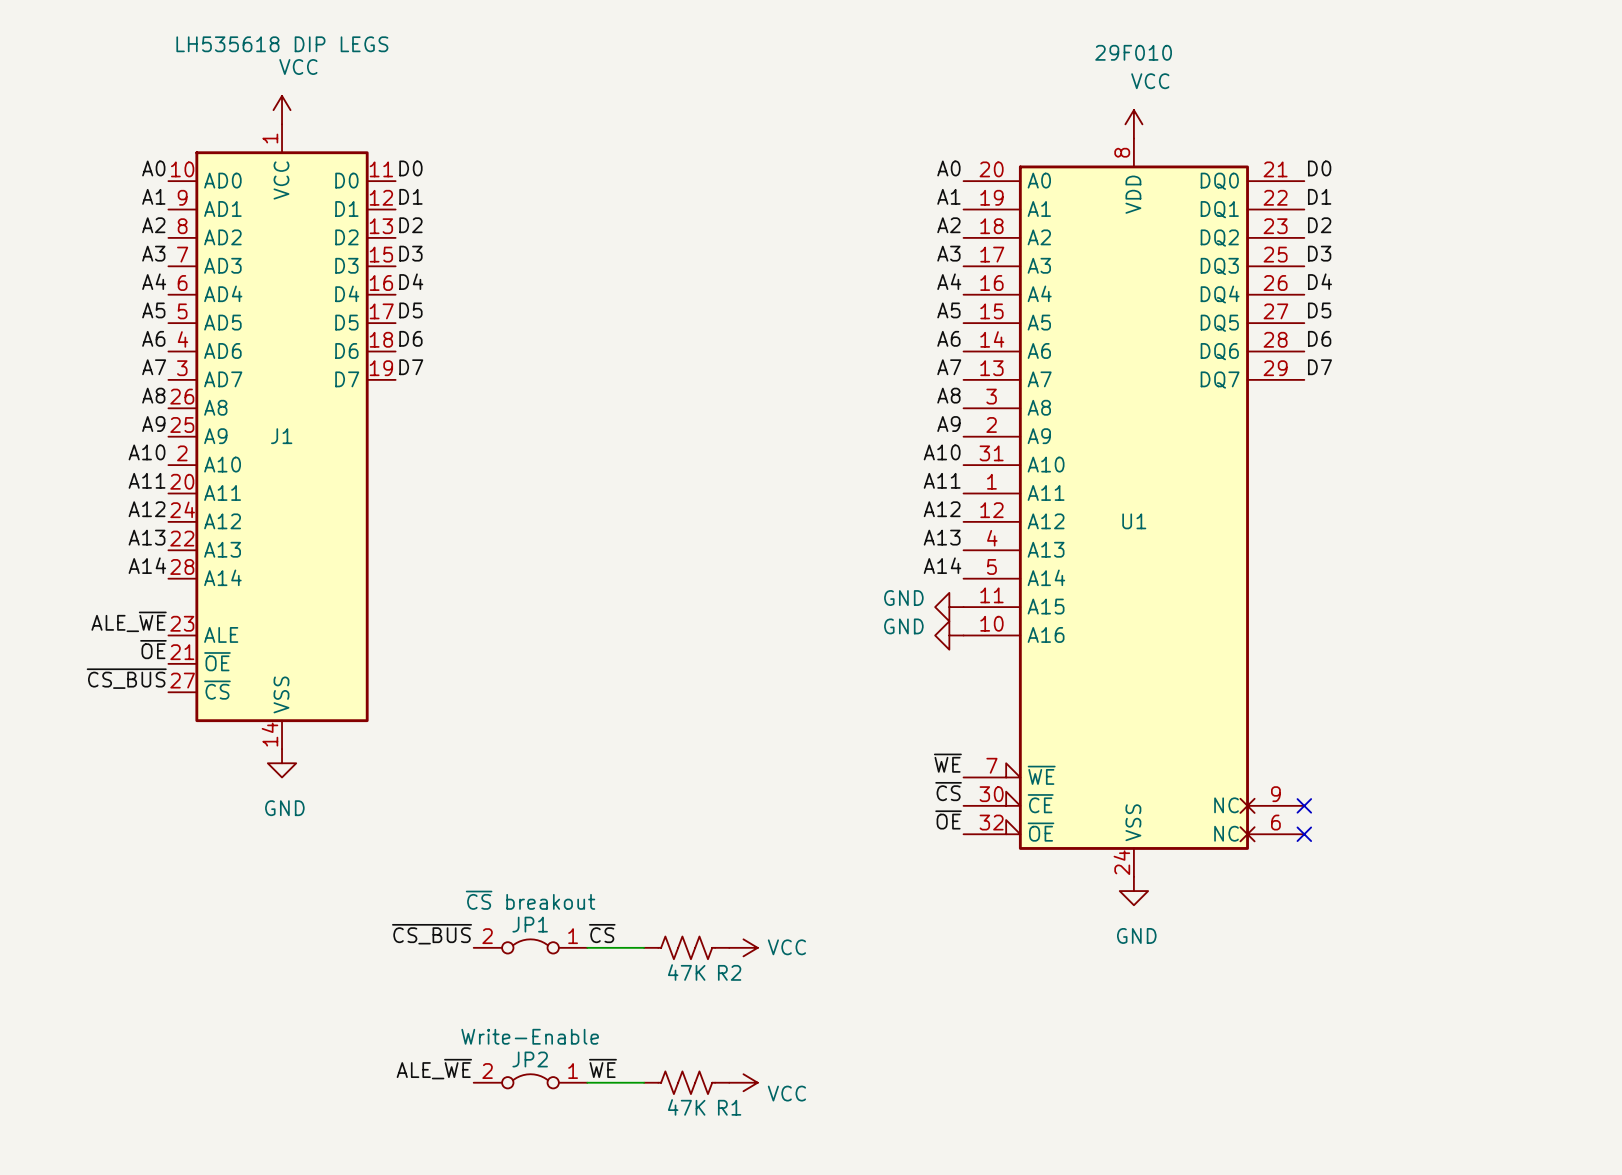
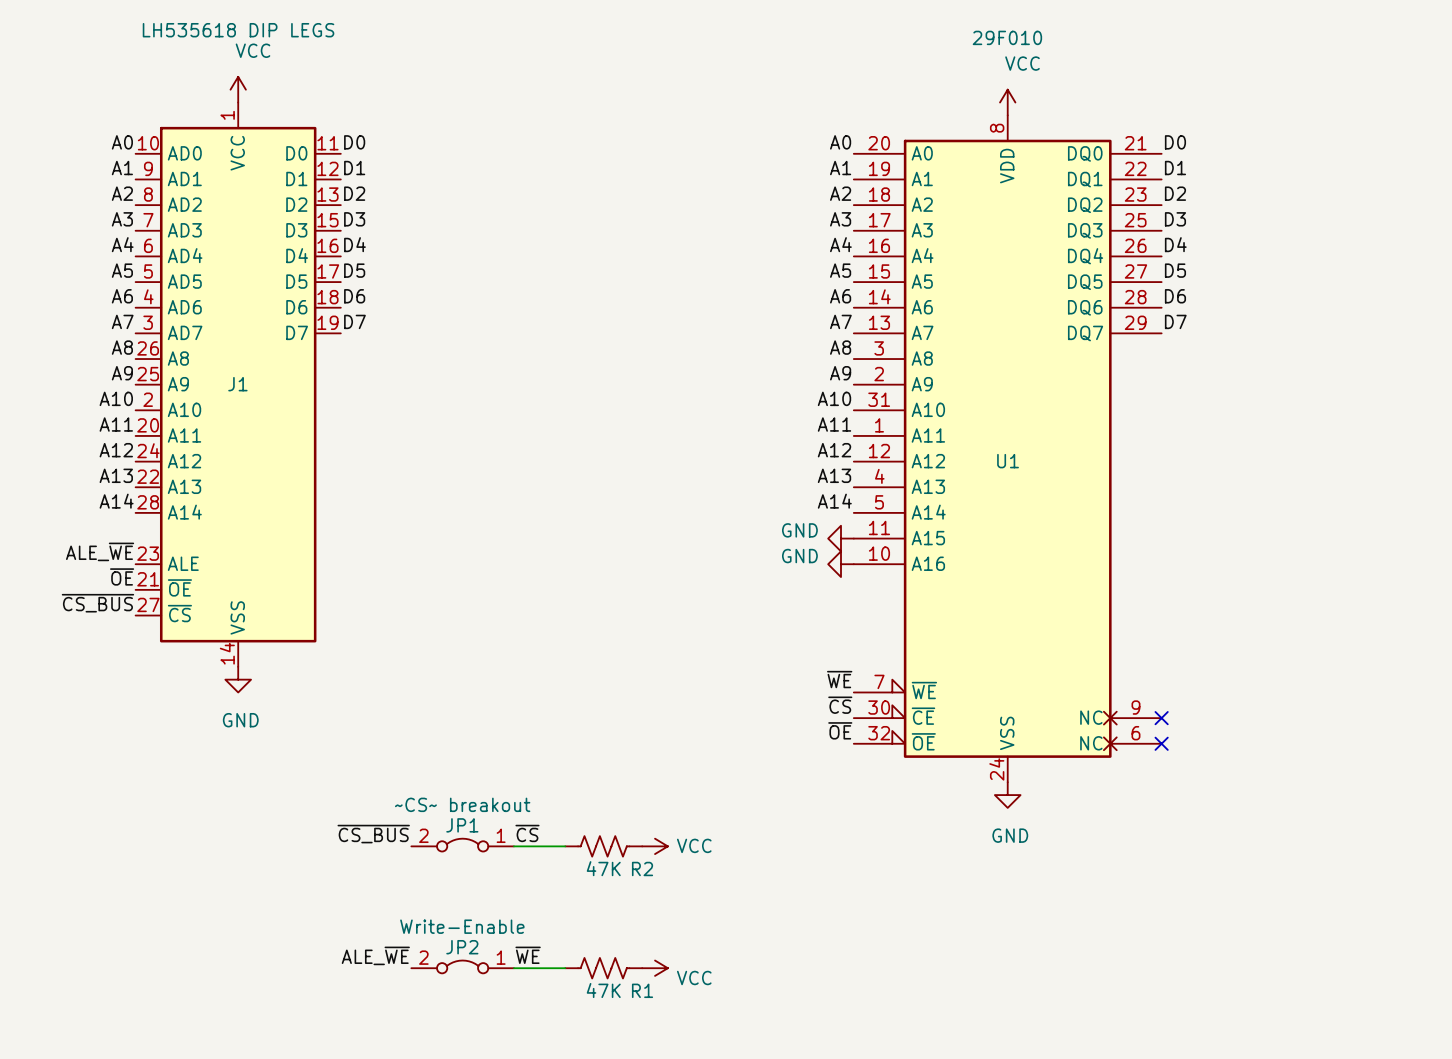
JP1 value: ~{CS} breakout (530, 900) -> ~CS~ breakout (462, 804)

